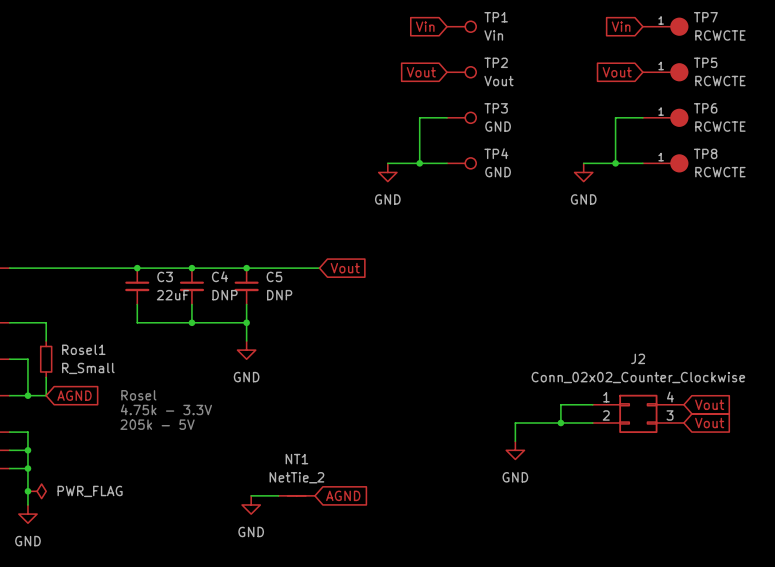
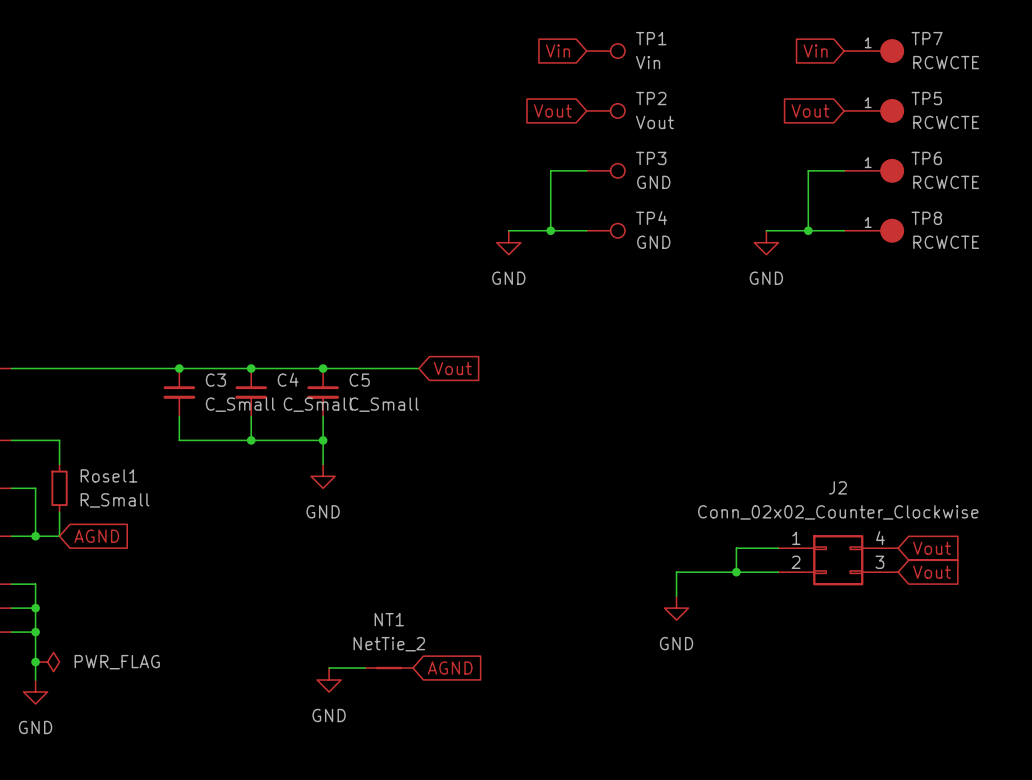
C3 value: 22uF (172, 295) -> C_Small (240, 404)
C4 value: DNP (224, 295) -> C_Small (318, 404)
C5 value: DNP (279, 295) -> C_Small (384, 404)
text: Rosel (138, 395) -> none
text: 4.75k - 3.3V (166, 409) -> none
text: 205k - 5V (157, 424) -> none

